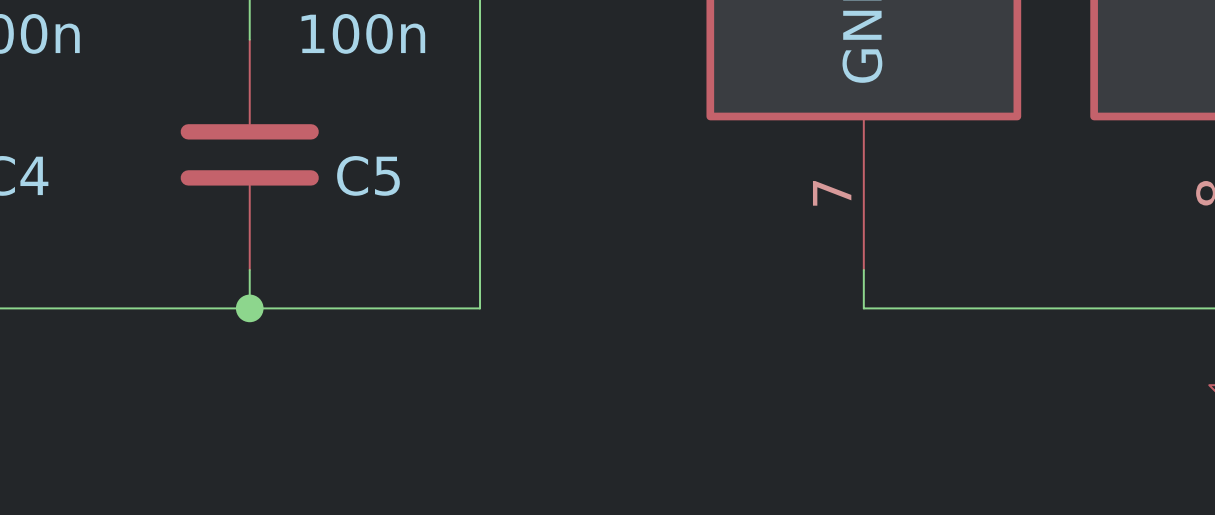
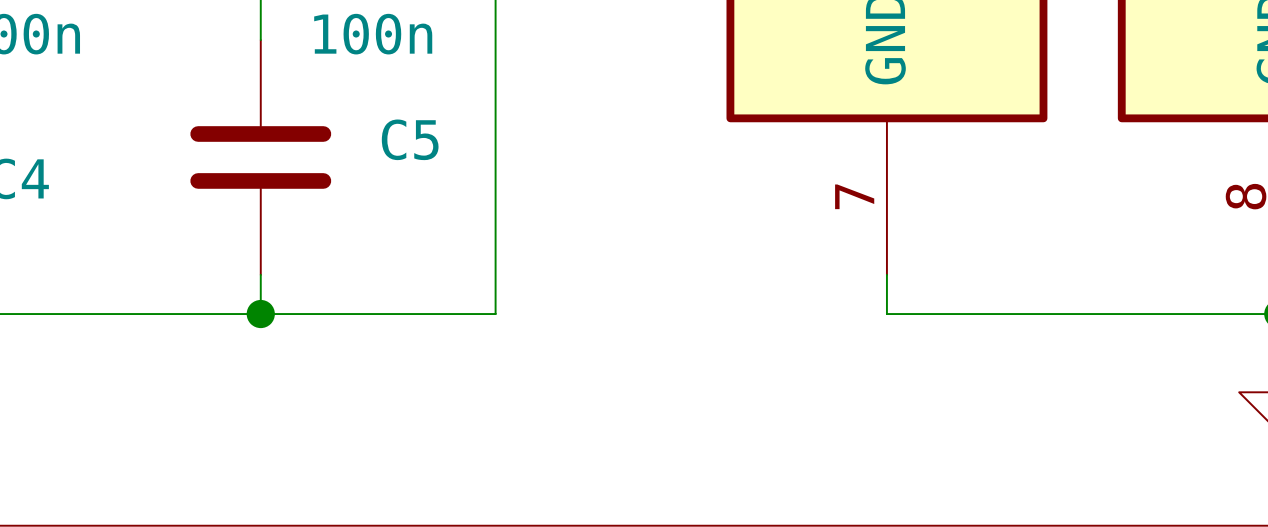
C5 name position: C5 (368, 175) -> C5 (410, 139)

